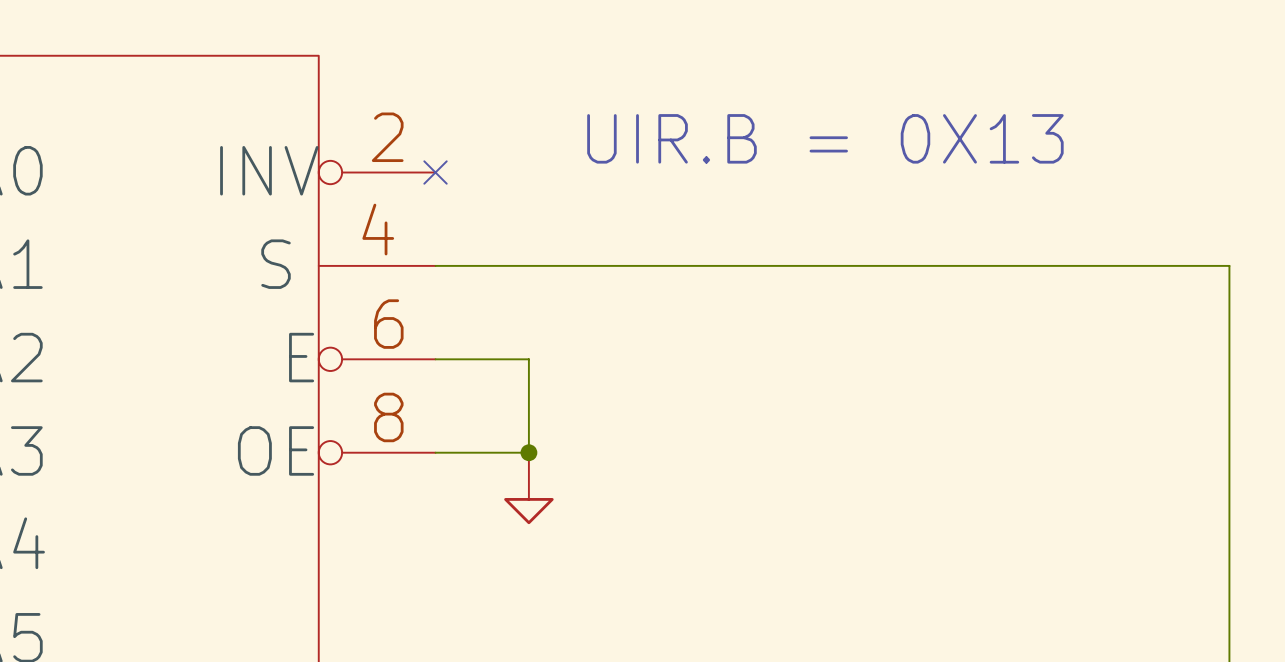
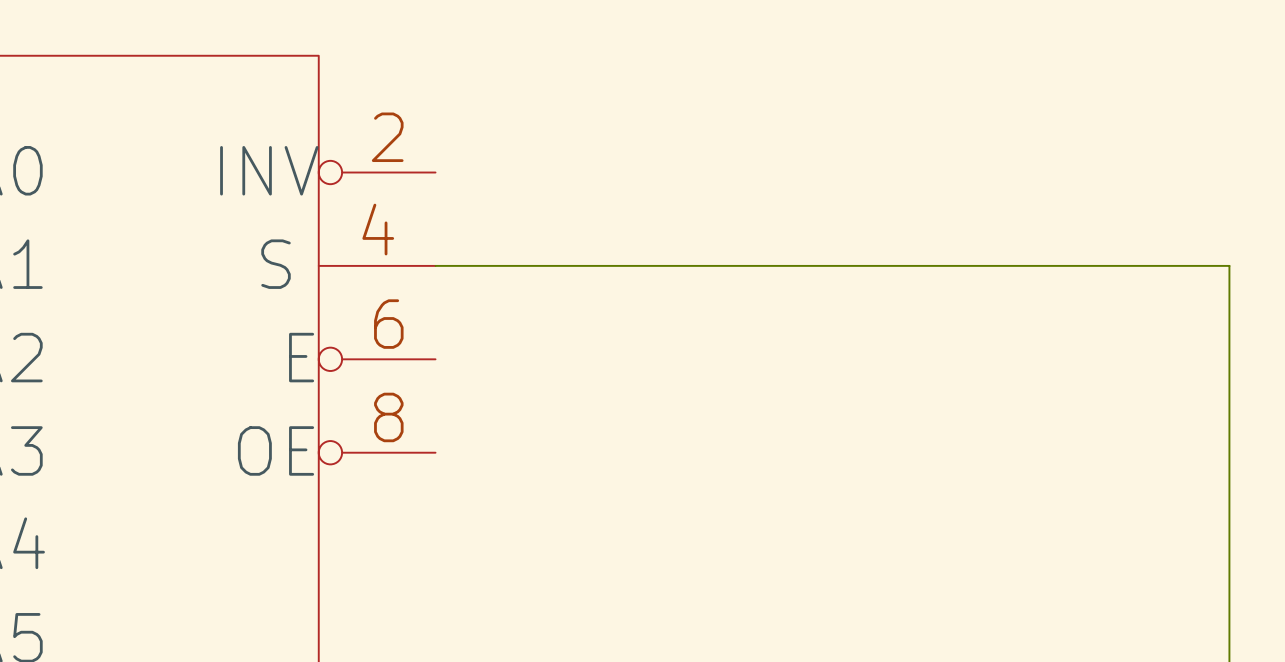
text: UIR.B = 0X13 (825, 138) -> none
no-connect mark: (435, 172) -> none
wire: (435, 359) (528, 359) (528, 452) (435, 452) -> none
junction: (528, 452) -> none
power symbol: (528, 488) -> none

